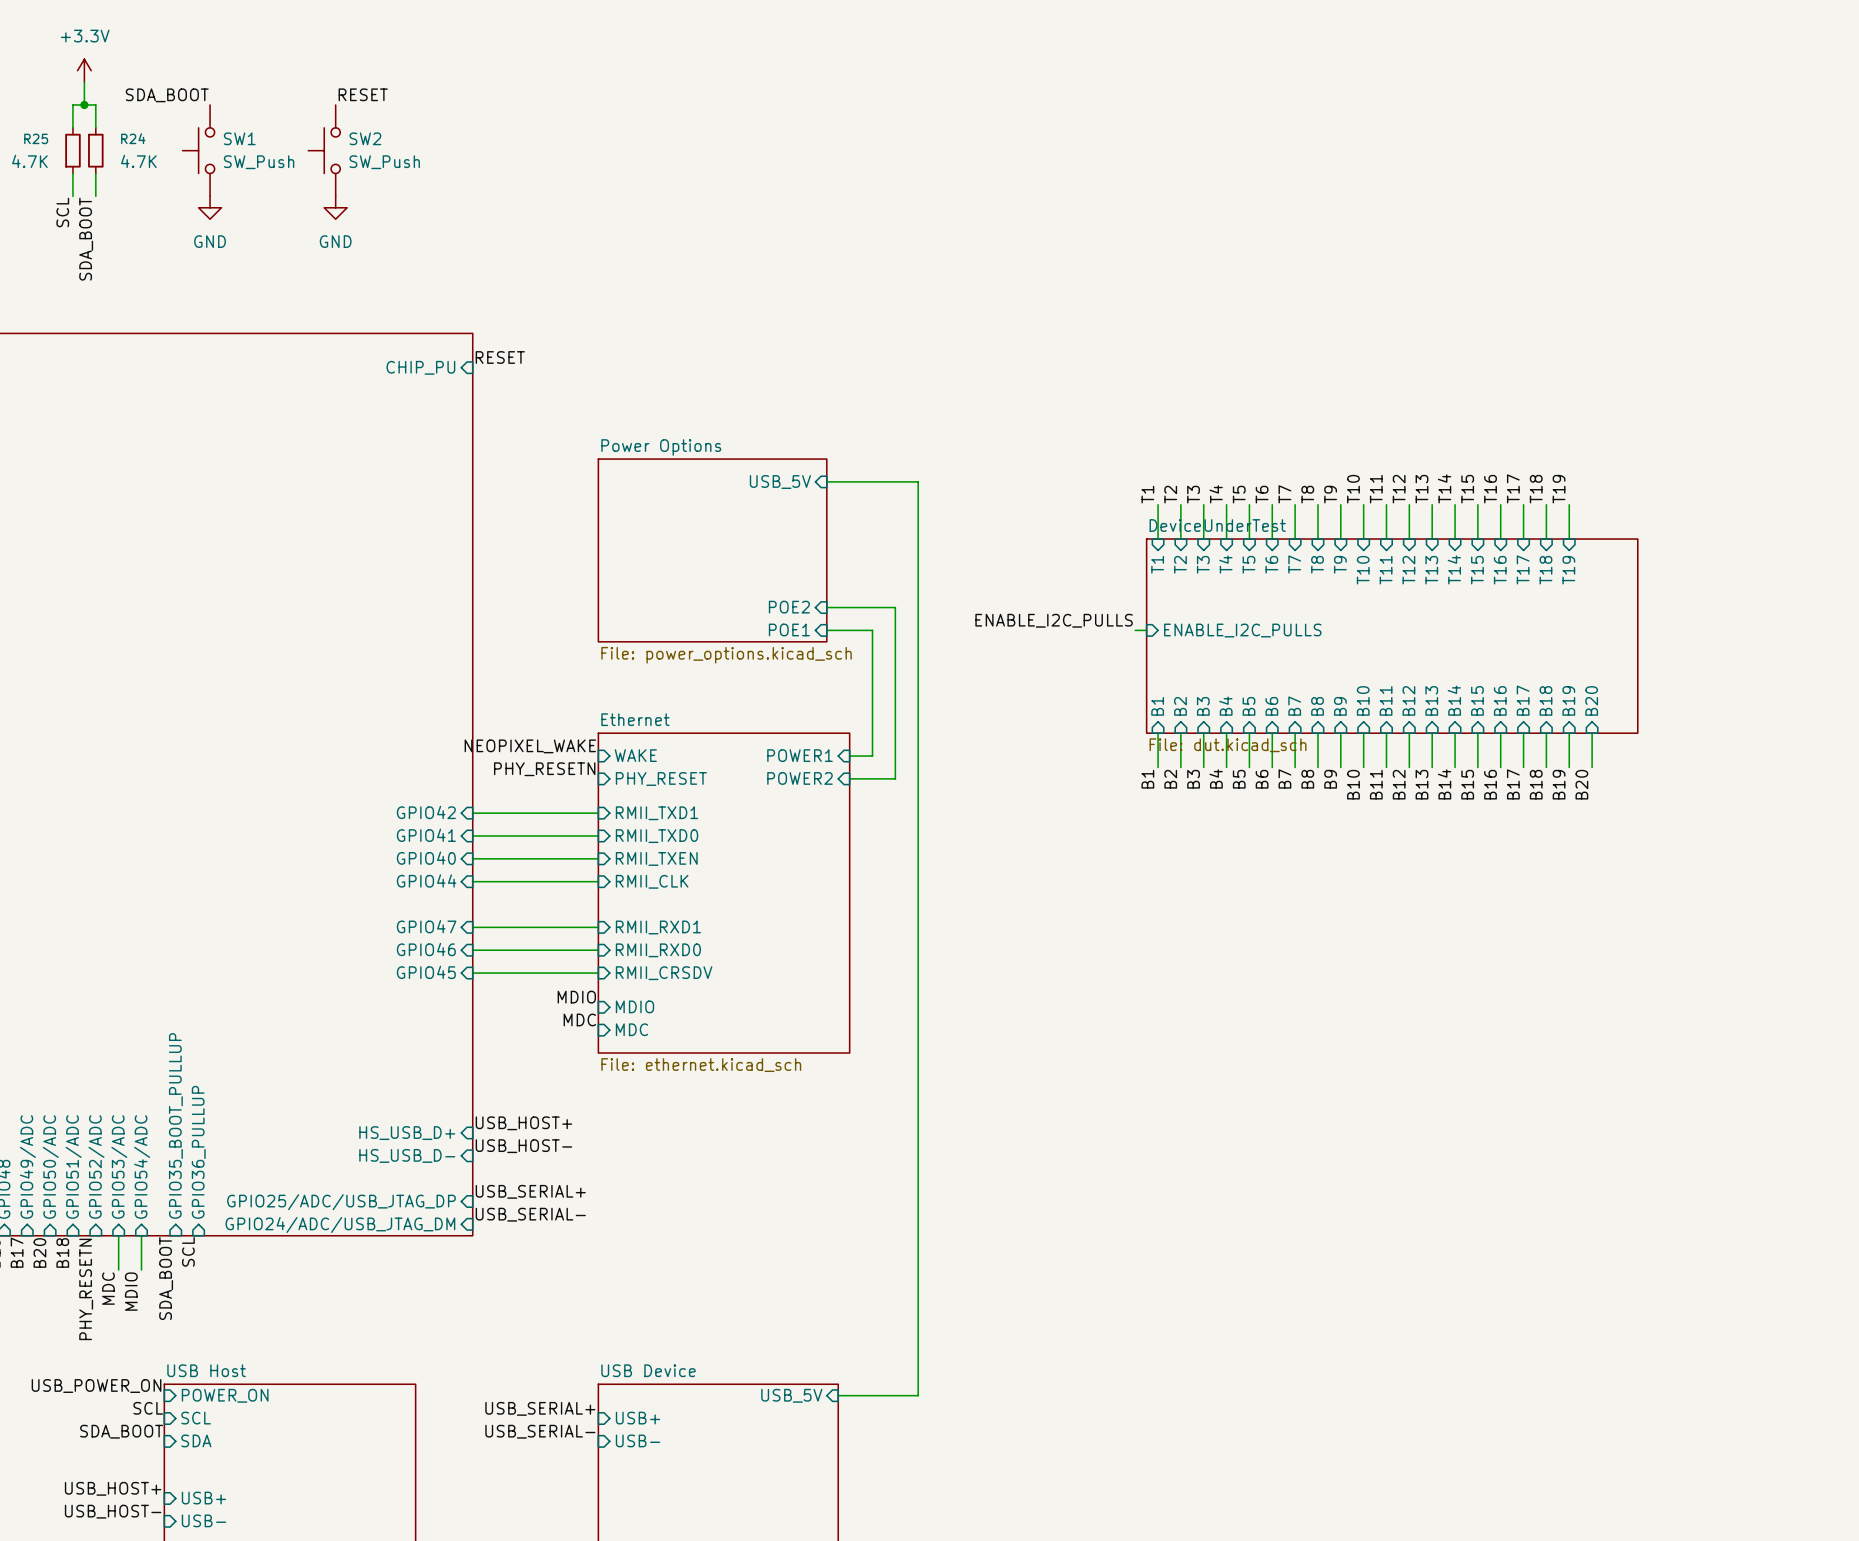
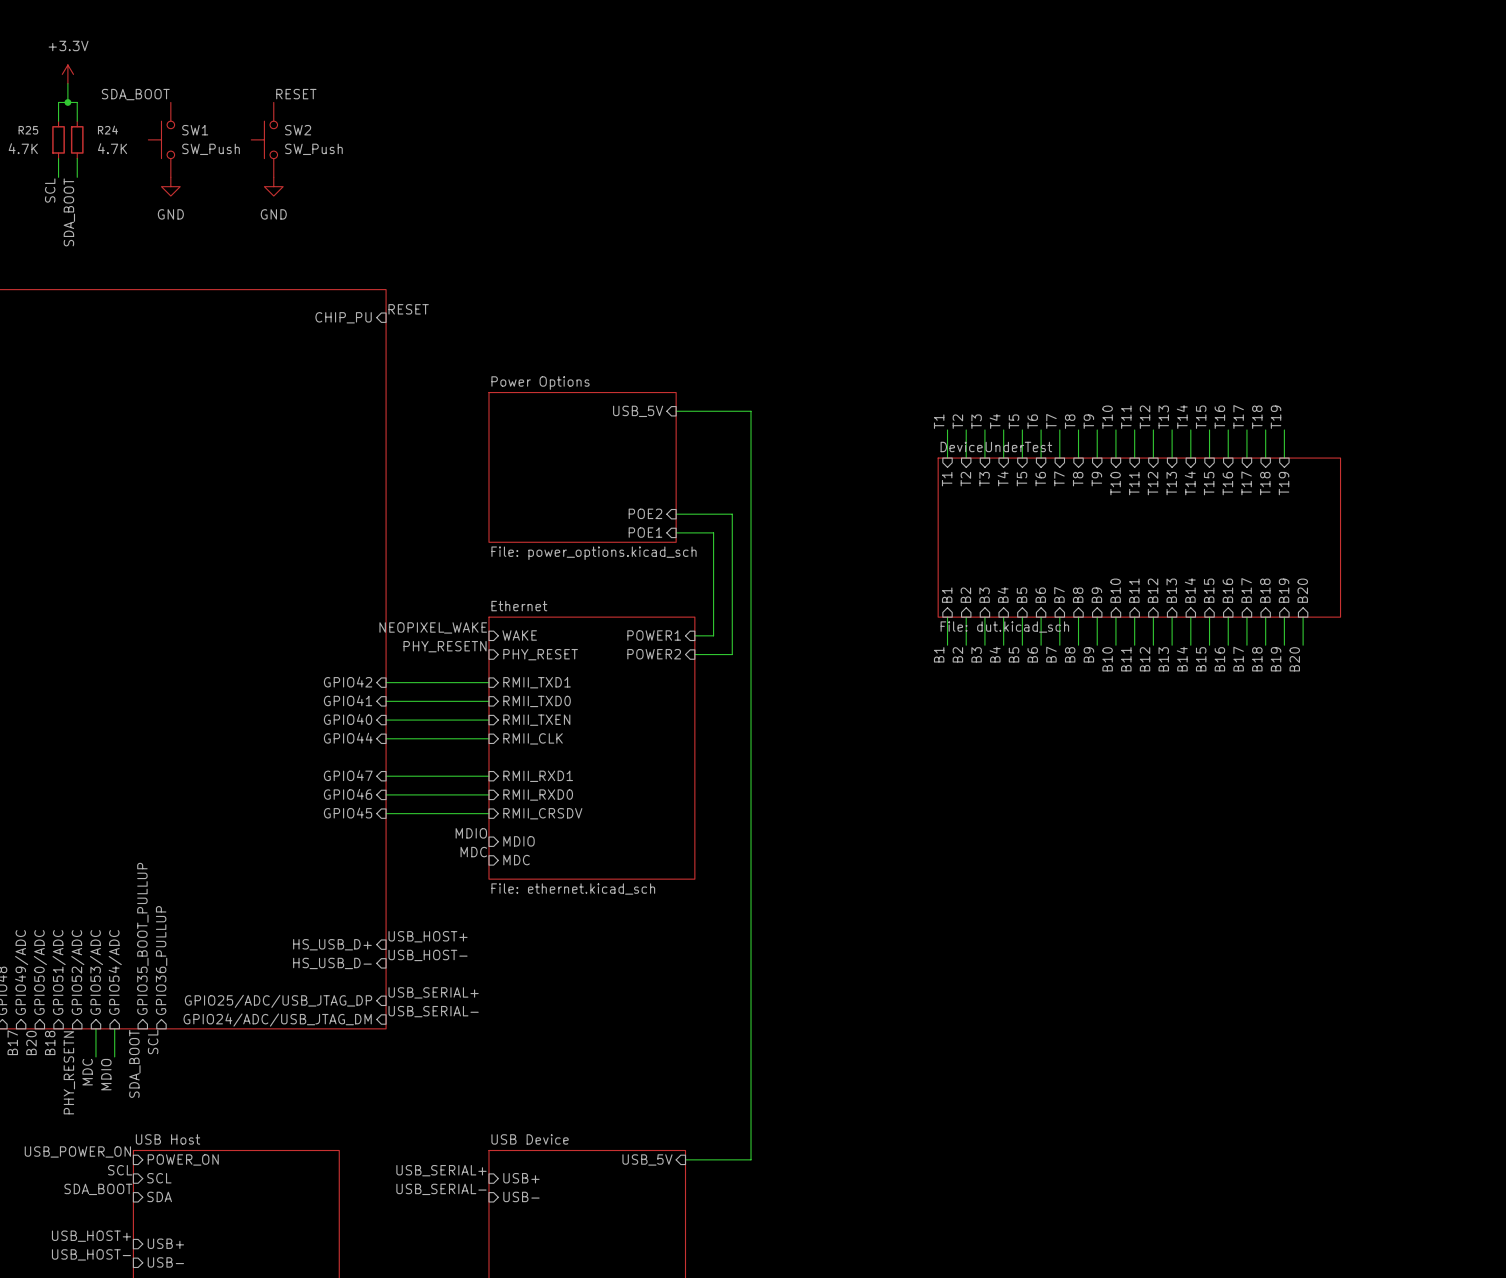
label: ENABLE_I2C_PULLS (1054, 620) -> none
wire: (1135, 630) (1146, 630) -> none
sheet pin: ENABLE_I2C_PULLS (1242, 630) -> none

